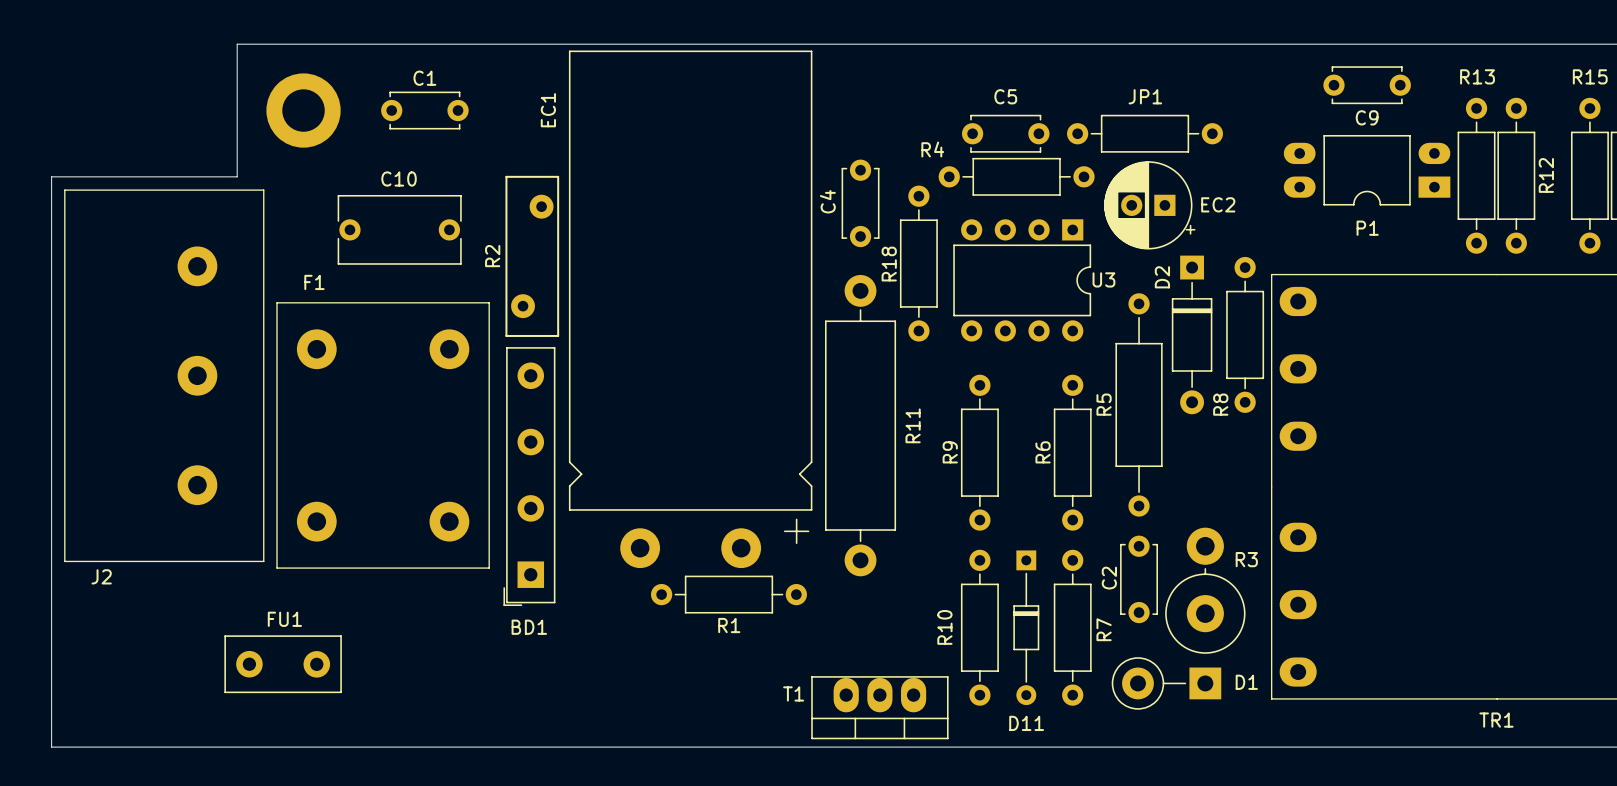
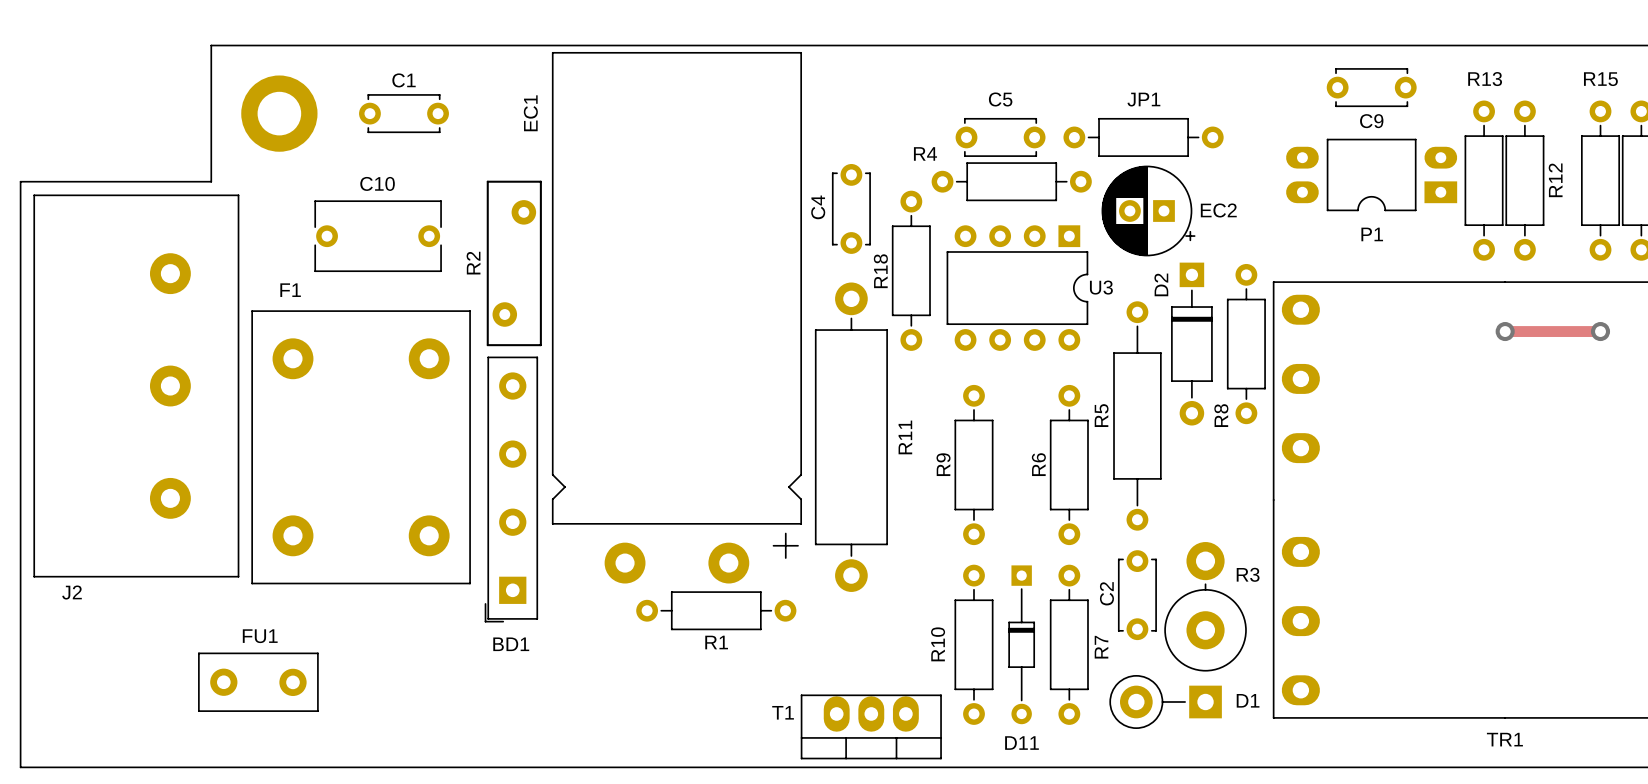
track: none -> (1505, 331) (1600, 331)
via: none -> (1505, 331)
via: none -> (1600, 331)

